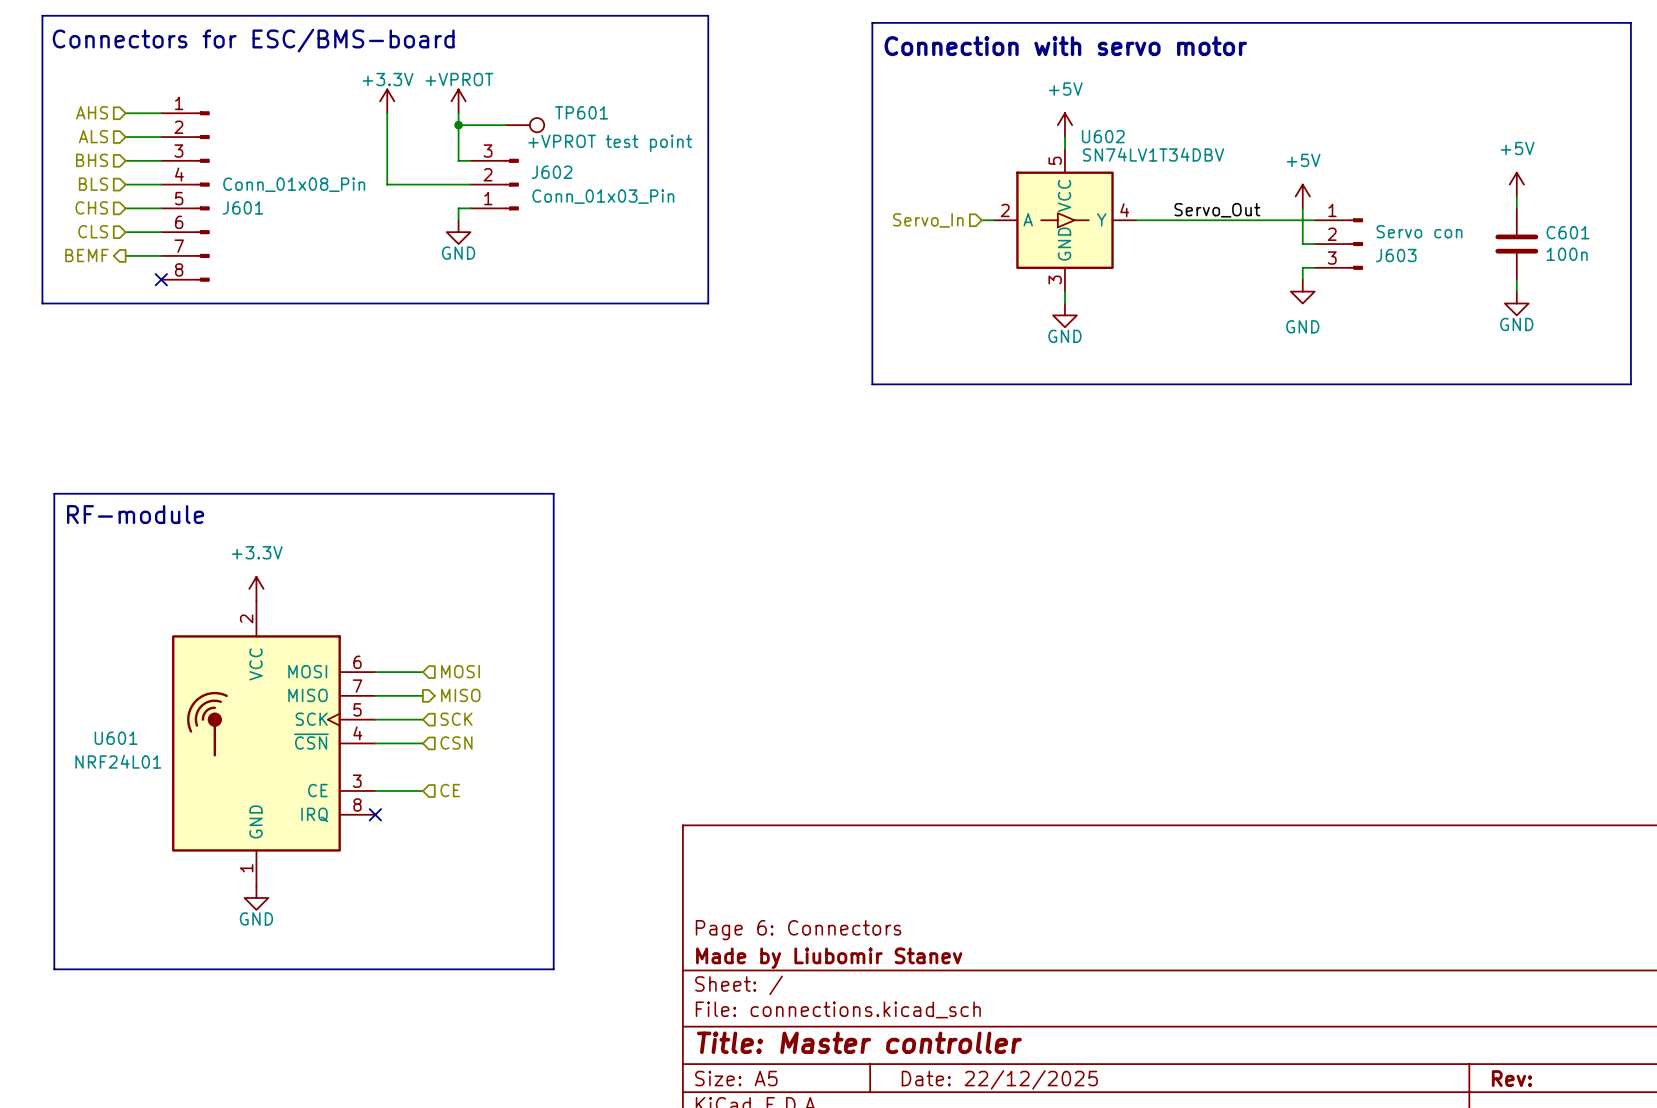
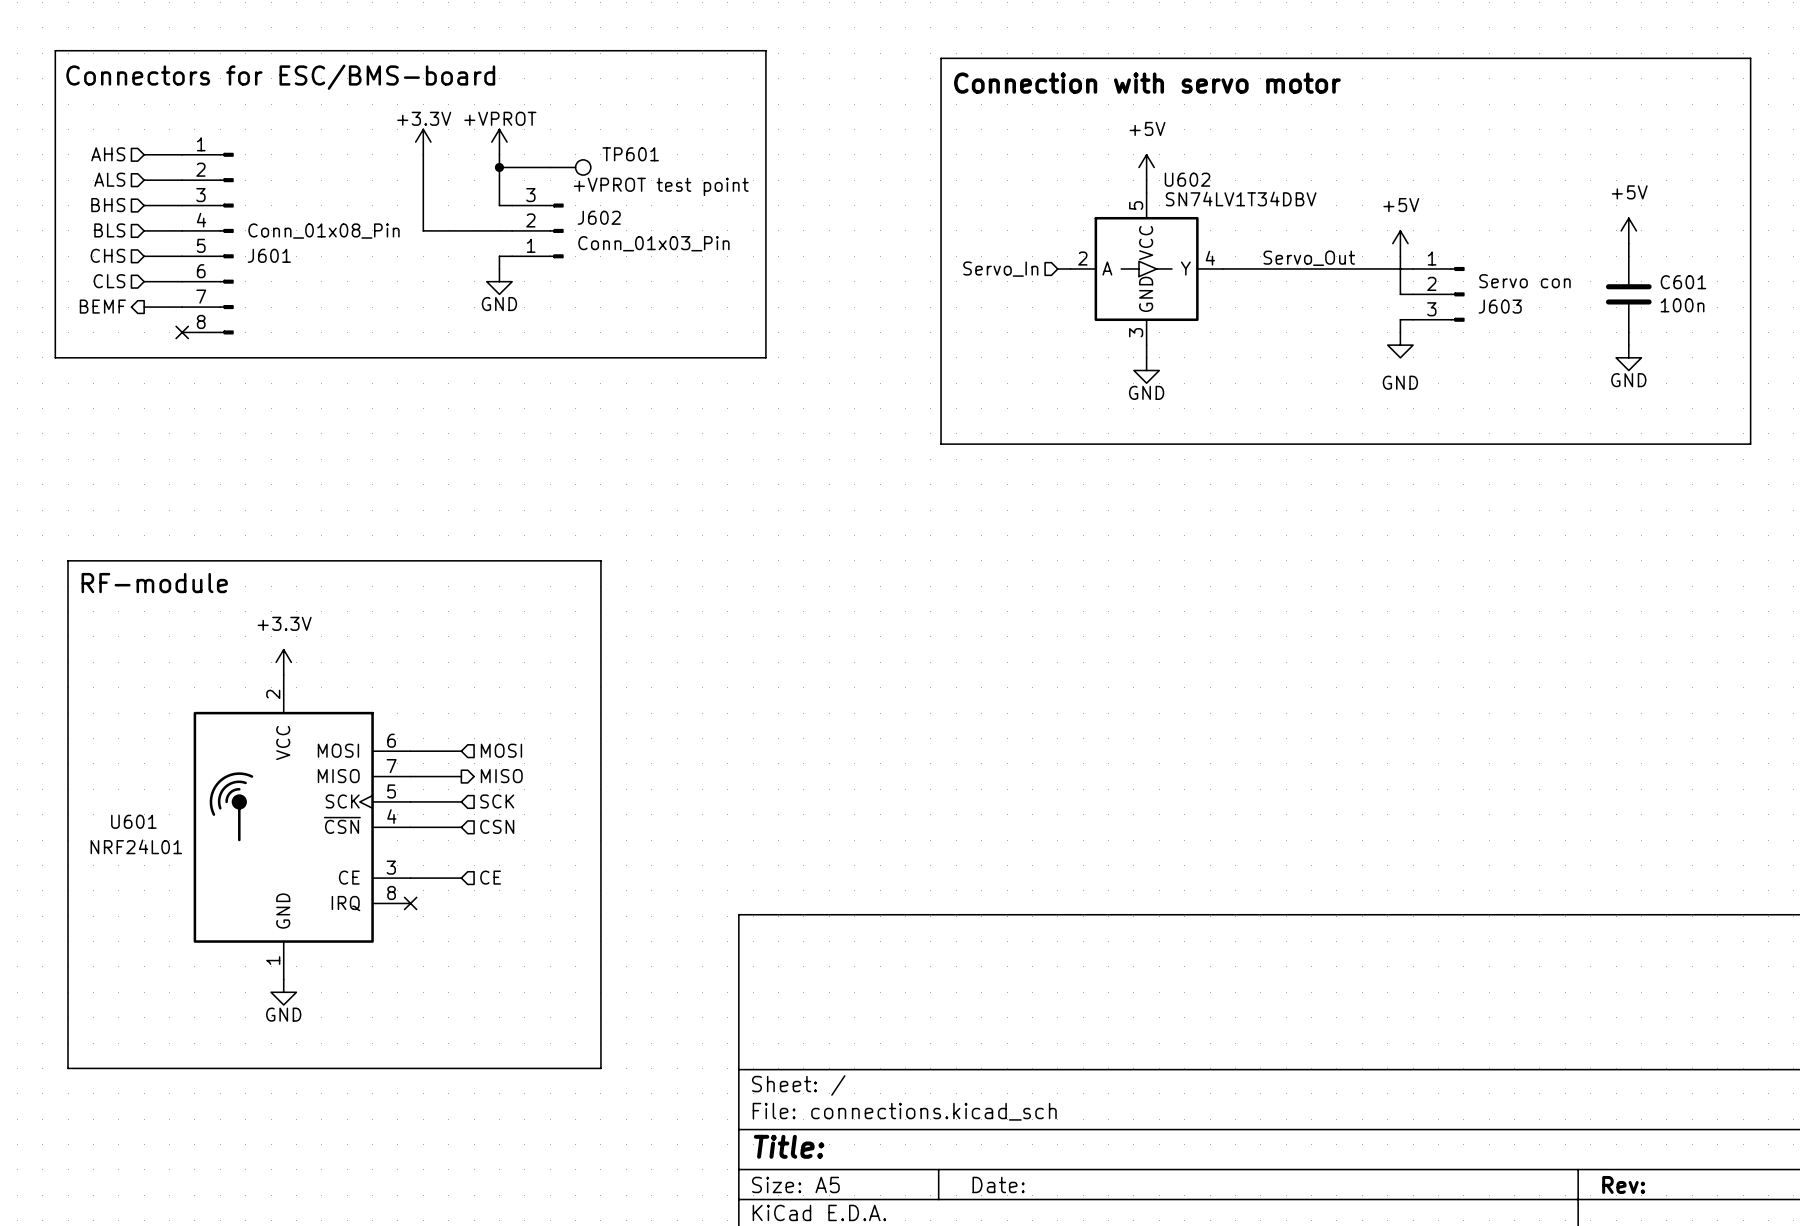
title block: Page 6: Connectors (798, 930) -> none
title block: Made by Liubomir Stanev (829, 958) -> none
title block: Title: Master controller (859, 1042) -> Title: (789, 1146)
title block: Date: 22/12/2025 (999, 1079) -> Date: (998, 1184)

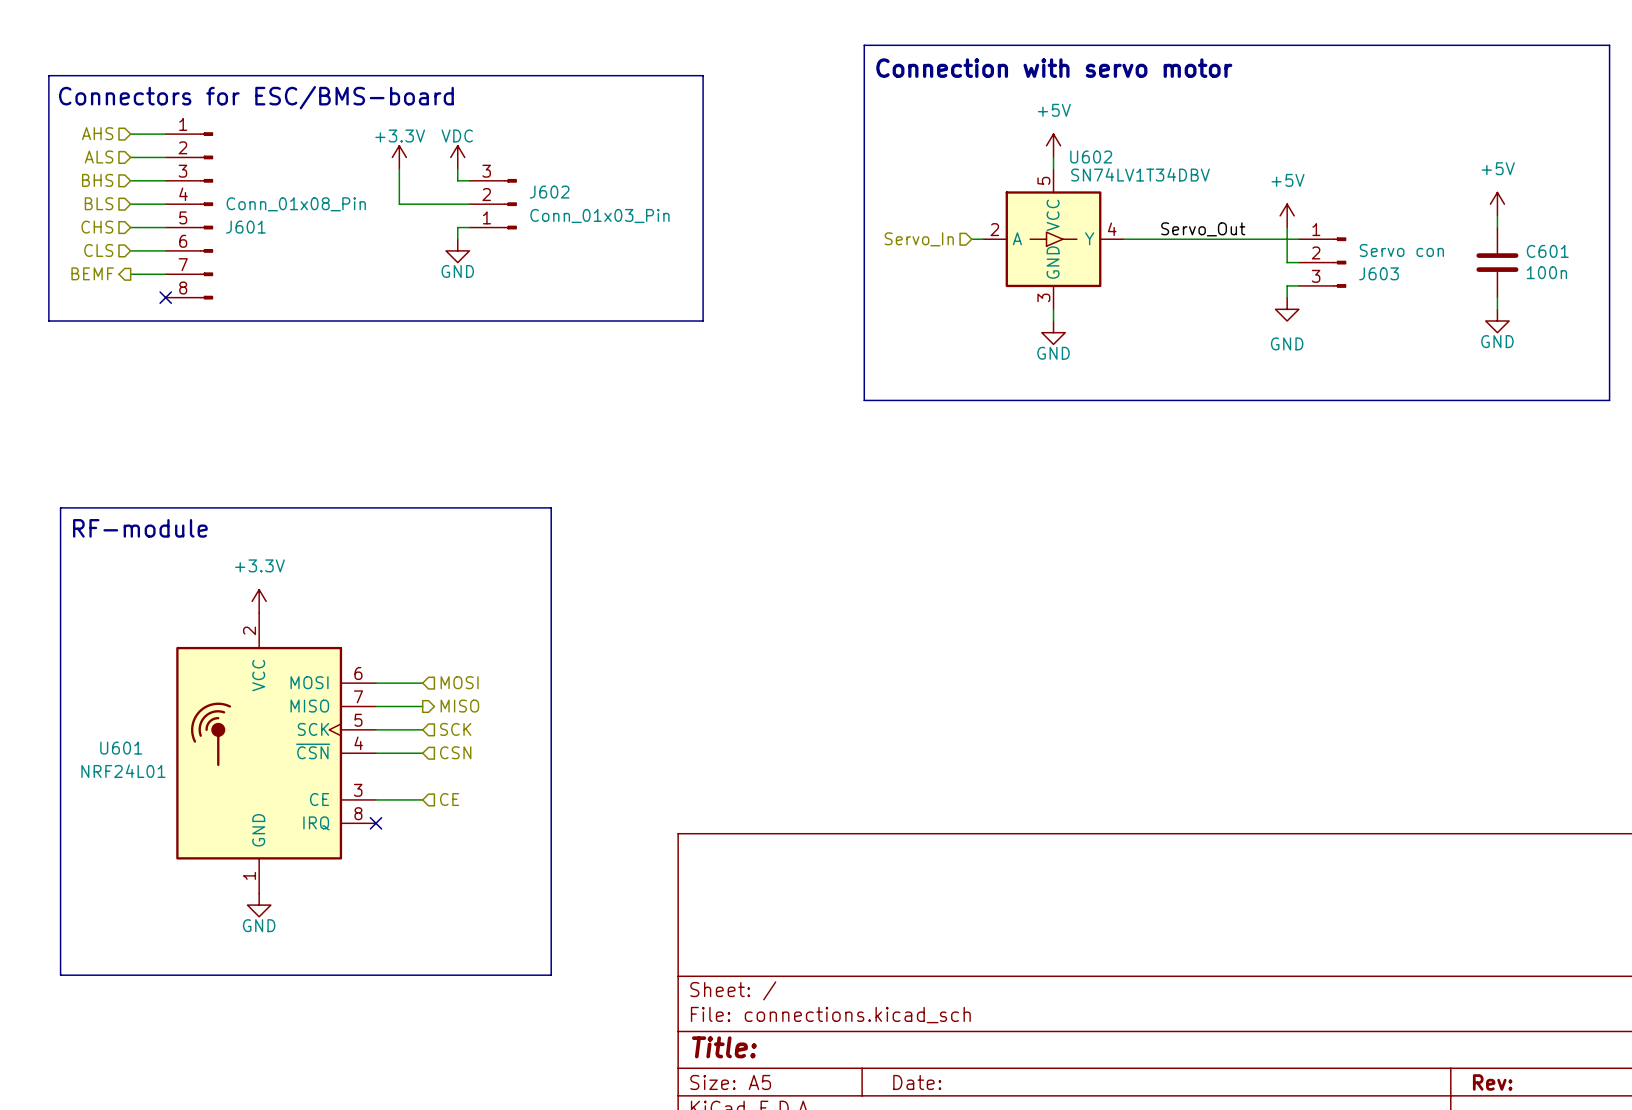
text position: Connectors for ESC/BMS-board (280, 77) -> Connectors for ESC/BMS-board (256, 97)
line: (55, 91) (55, 50) (765, 50) (765, 91) -> (48, 75) (703, 75)
power symbol position: +3.3V (423, 142) -> +3.3V (399, 157)
power symbol: +VPROT (499, 142) -> none
wire: (423, 154) (423, 230) (435, 230) -> (399, 169) (399, 204)
wire: (499, 167) (550, 167) -> none
junction: (499, 167) -> none
TP601: +VPROT test point (570, 167) -> none
power symbol: none -> VDC (457, 157)

